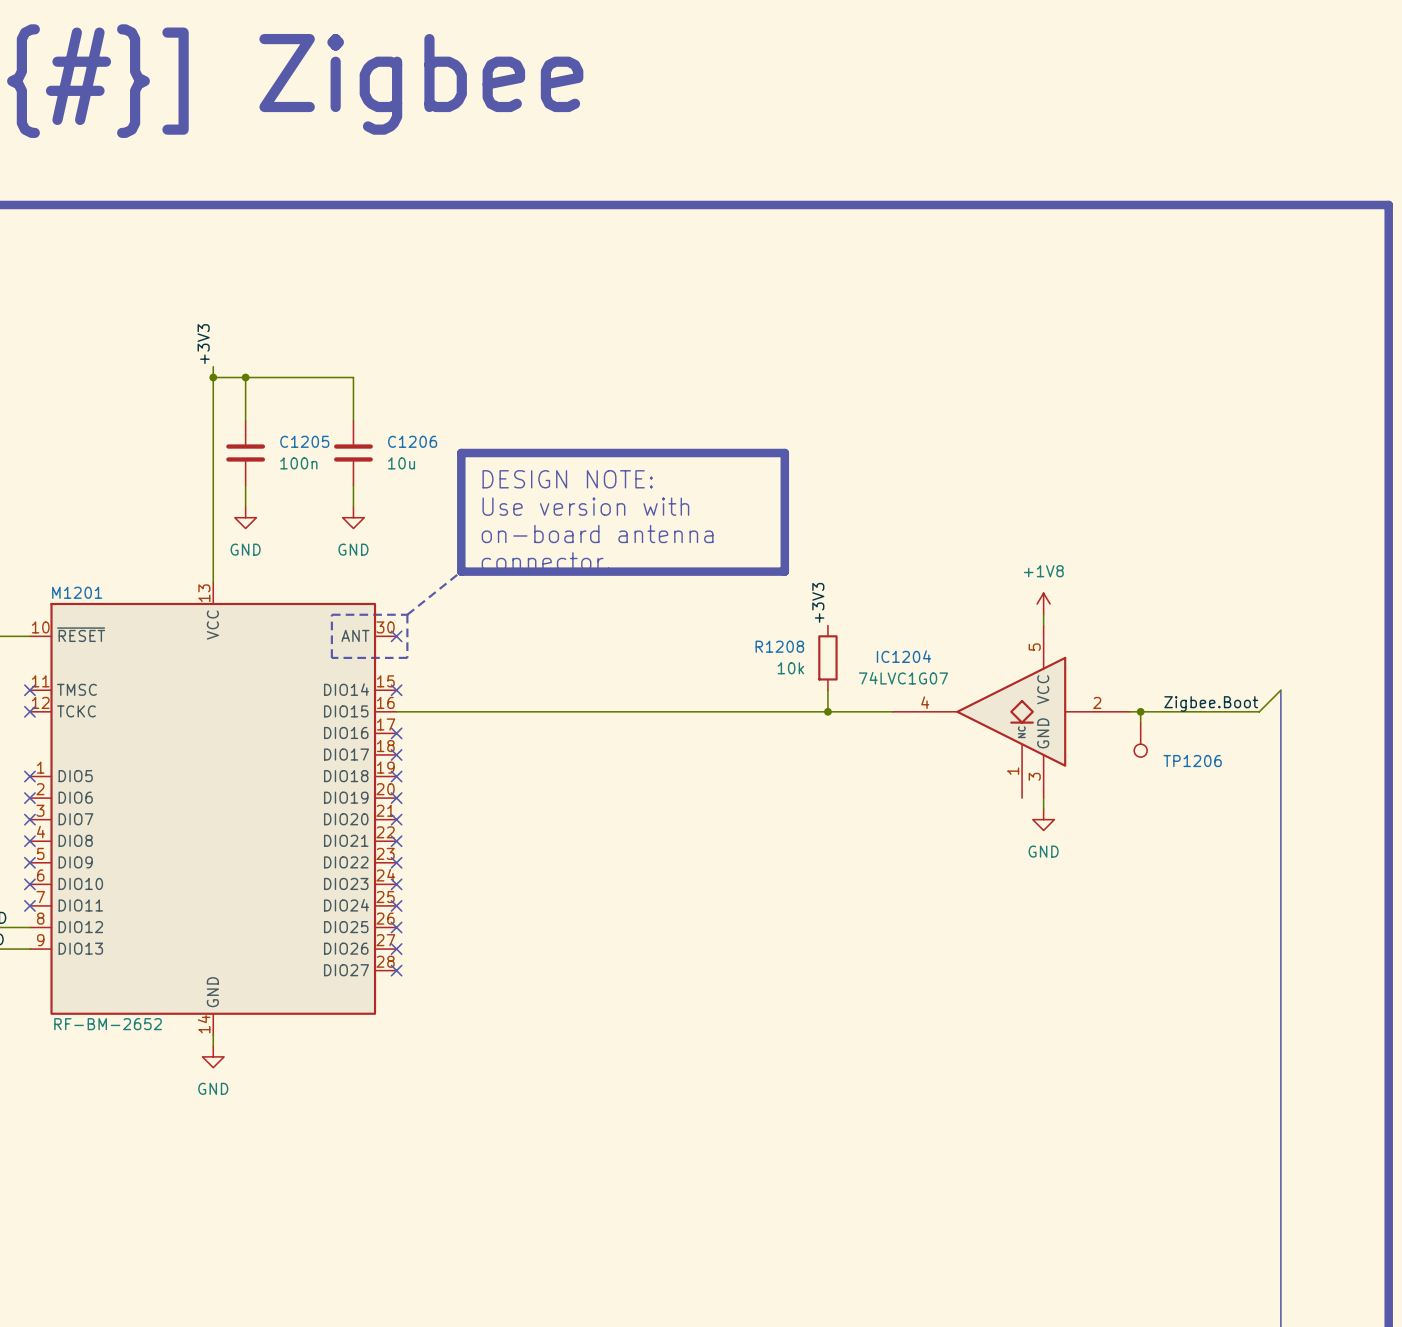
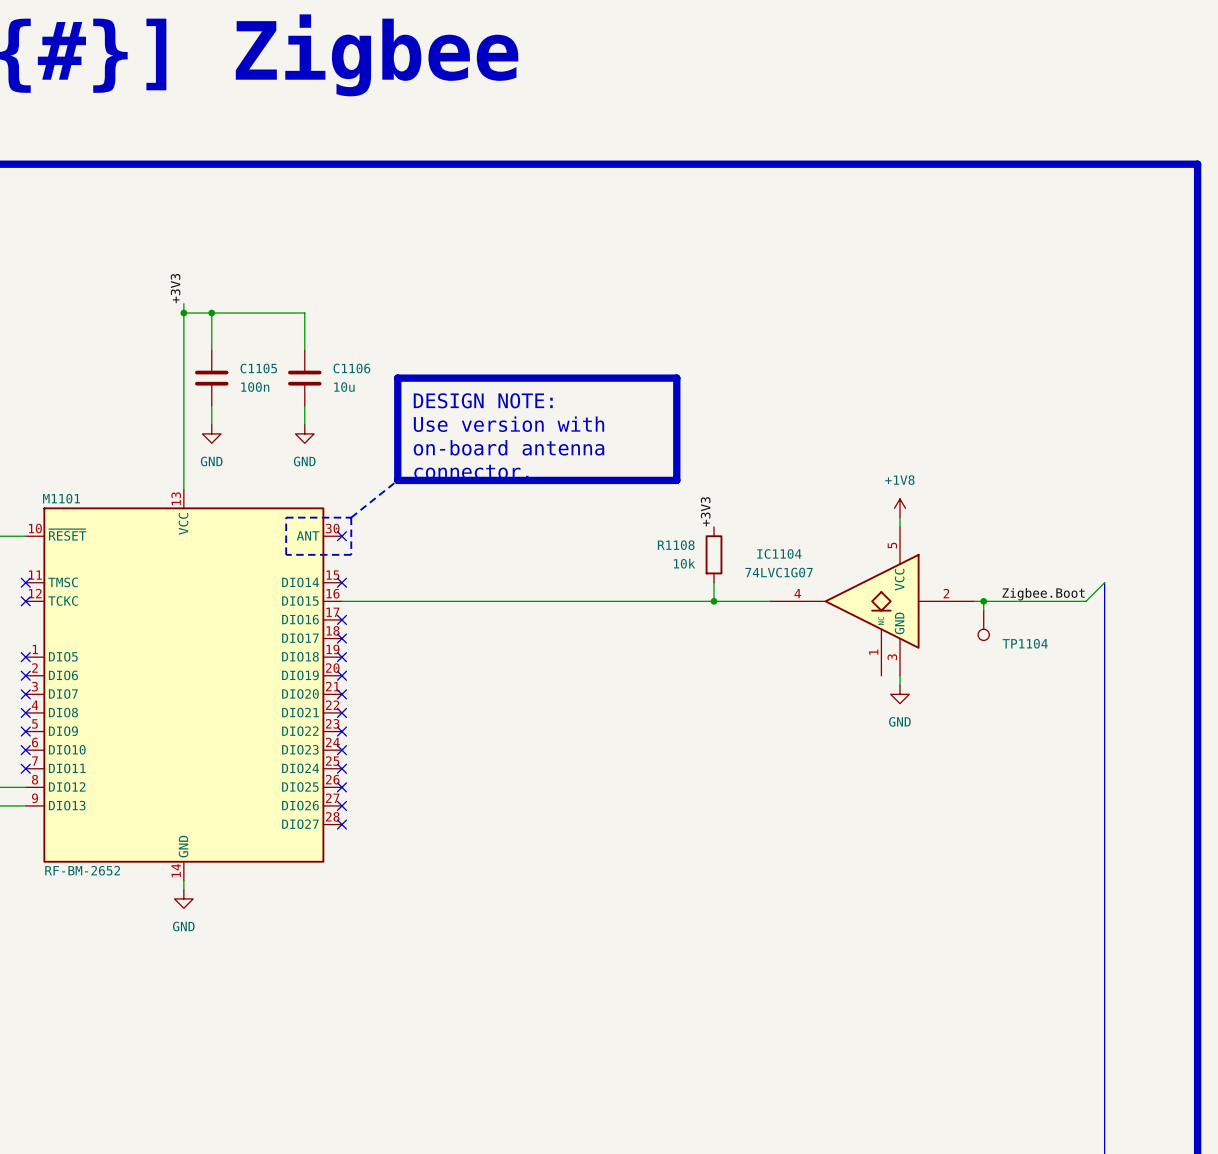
C1205 name: C1205 (304, 441) -> C1105 (258, 368)
C1206 name: C1206 (412, 441) -> C1106 (351, 368)
M1201 name: M1201 (77, 592) -> M1101 (61, 498)
R1208 name: R1208 (779, 646) -> R1108 (676, 545)
IC1204 name: IC1204 (903, 656) -> IC1104 (779, 553)
TP1206 name: TP1206 (1192, 761) -> TP1104 (1025, 643)

